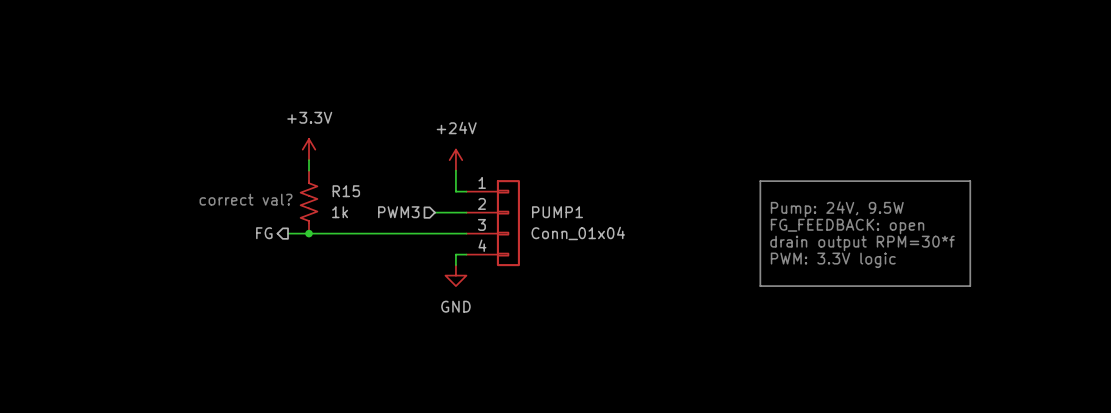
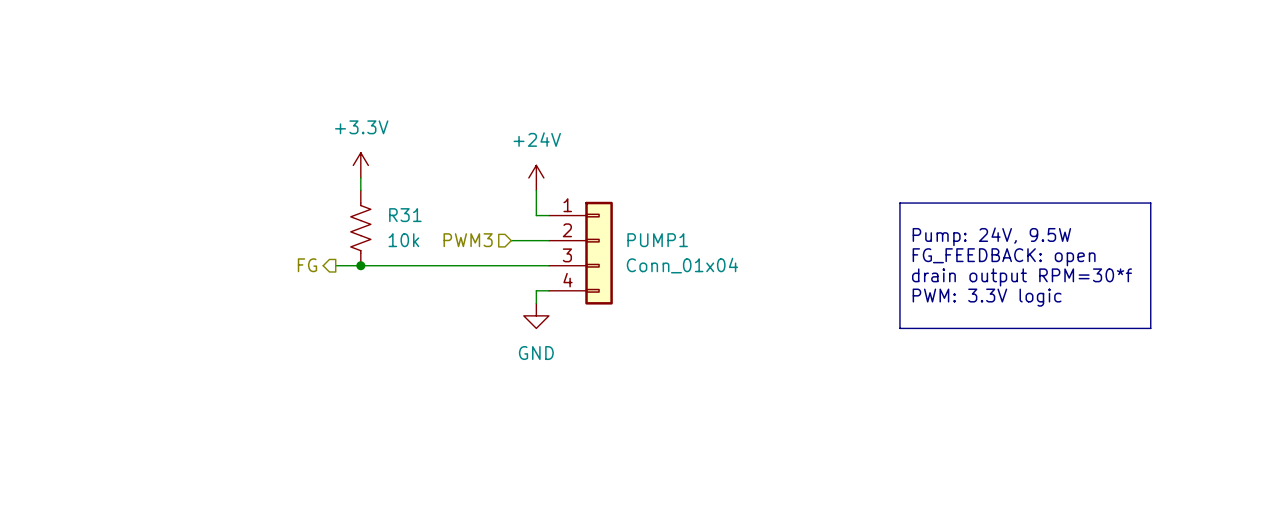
R15 name: R15 (346, 191) -> R31 (405, 215)
text: correct val? (246, 199) -> none
R15 value: 1k (340, 212) -> 10k (403, 240)

